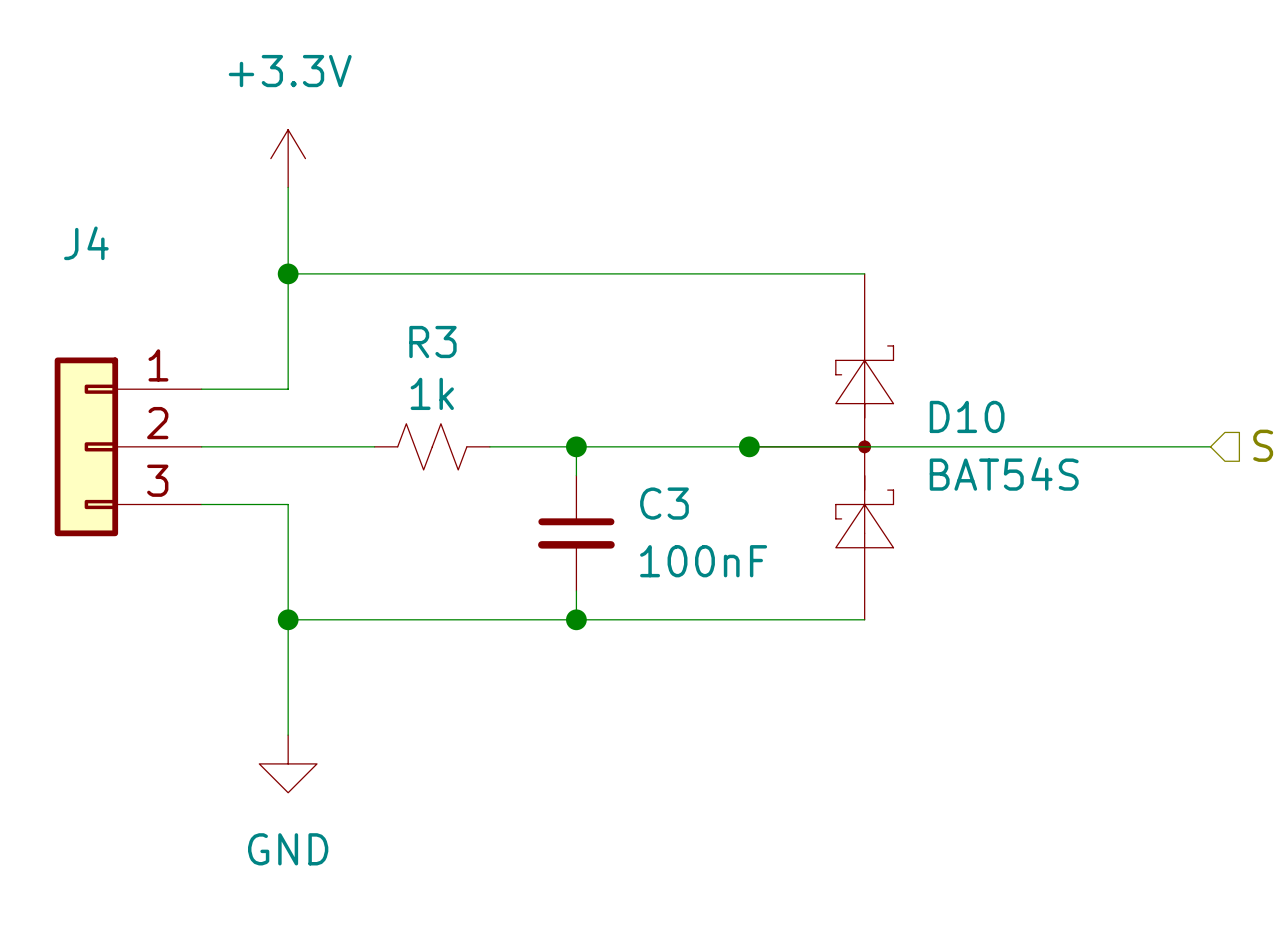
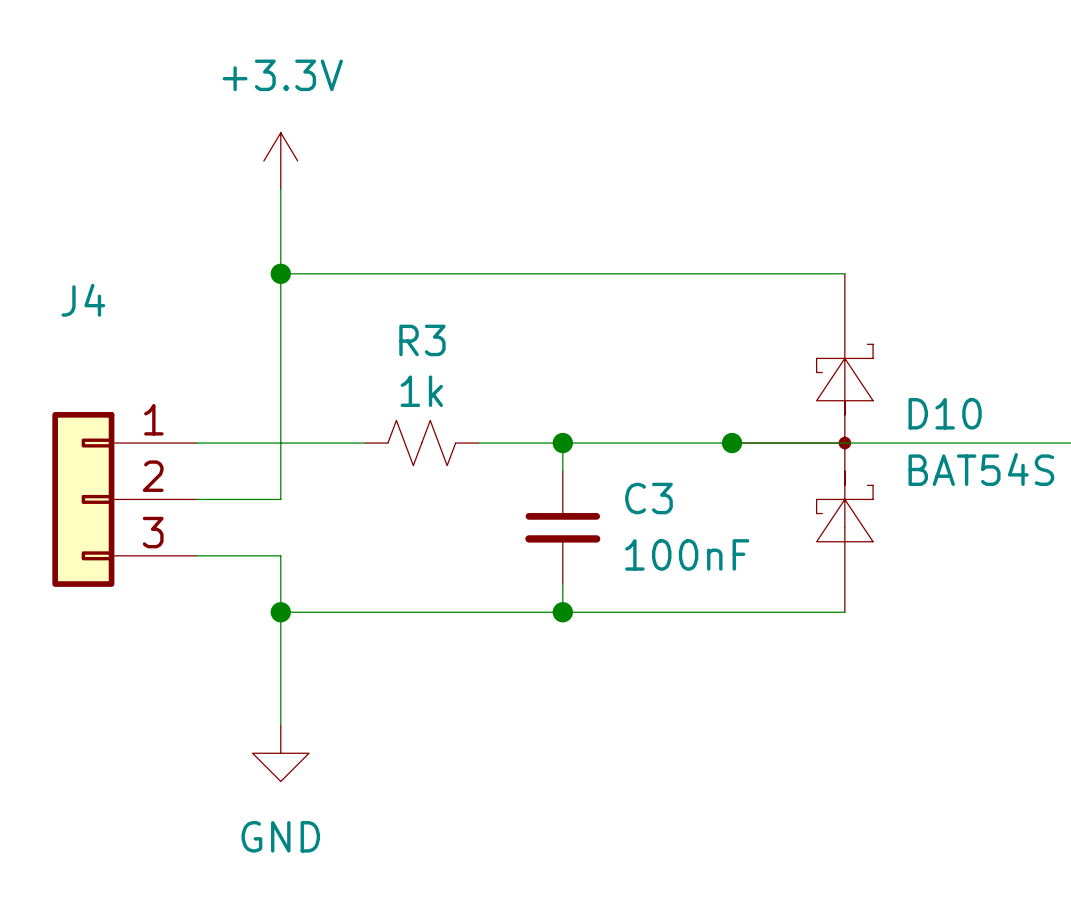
wire: (201, 389) (288, 389) -> (280, 499) (280, 386)
J4 position: (128, 446) -> (124, 499)
wire: (288, 504) (288, 562) -> (196, 555) (280, 555)

